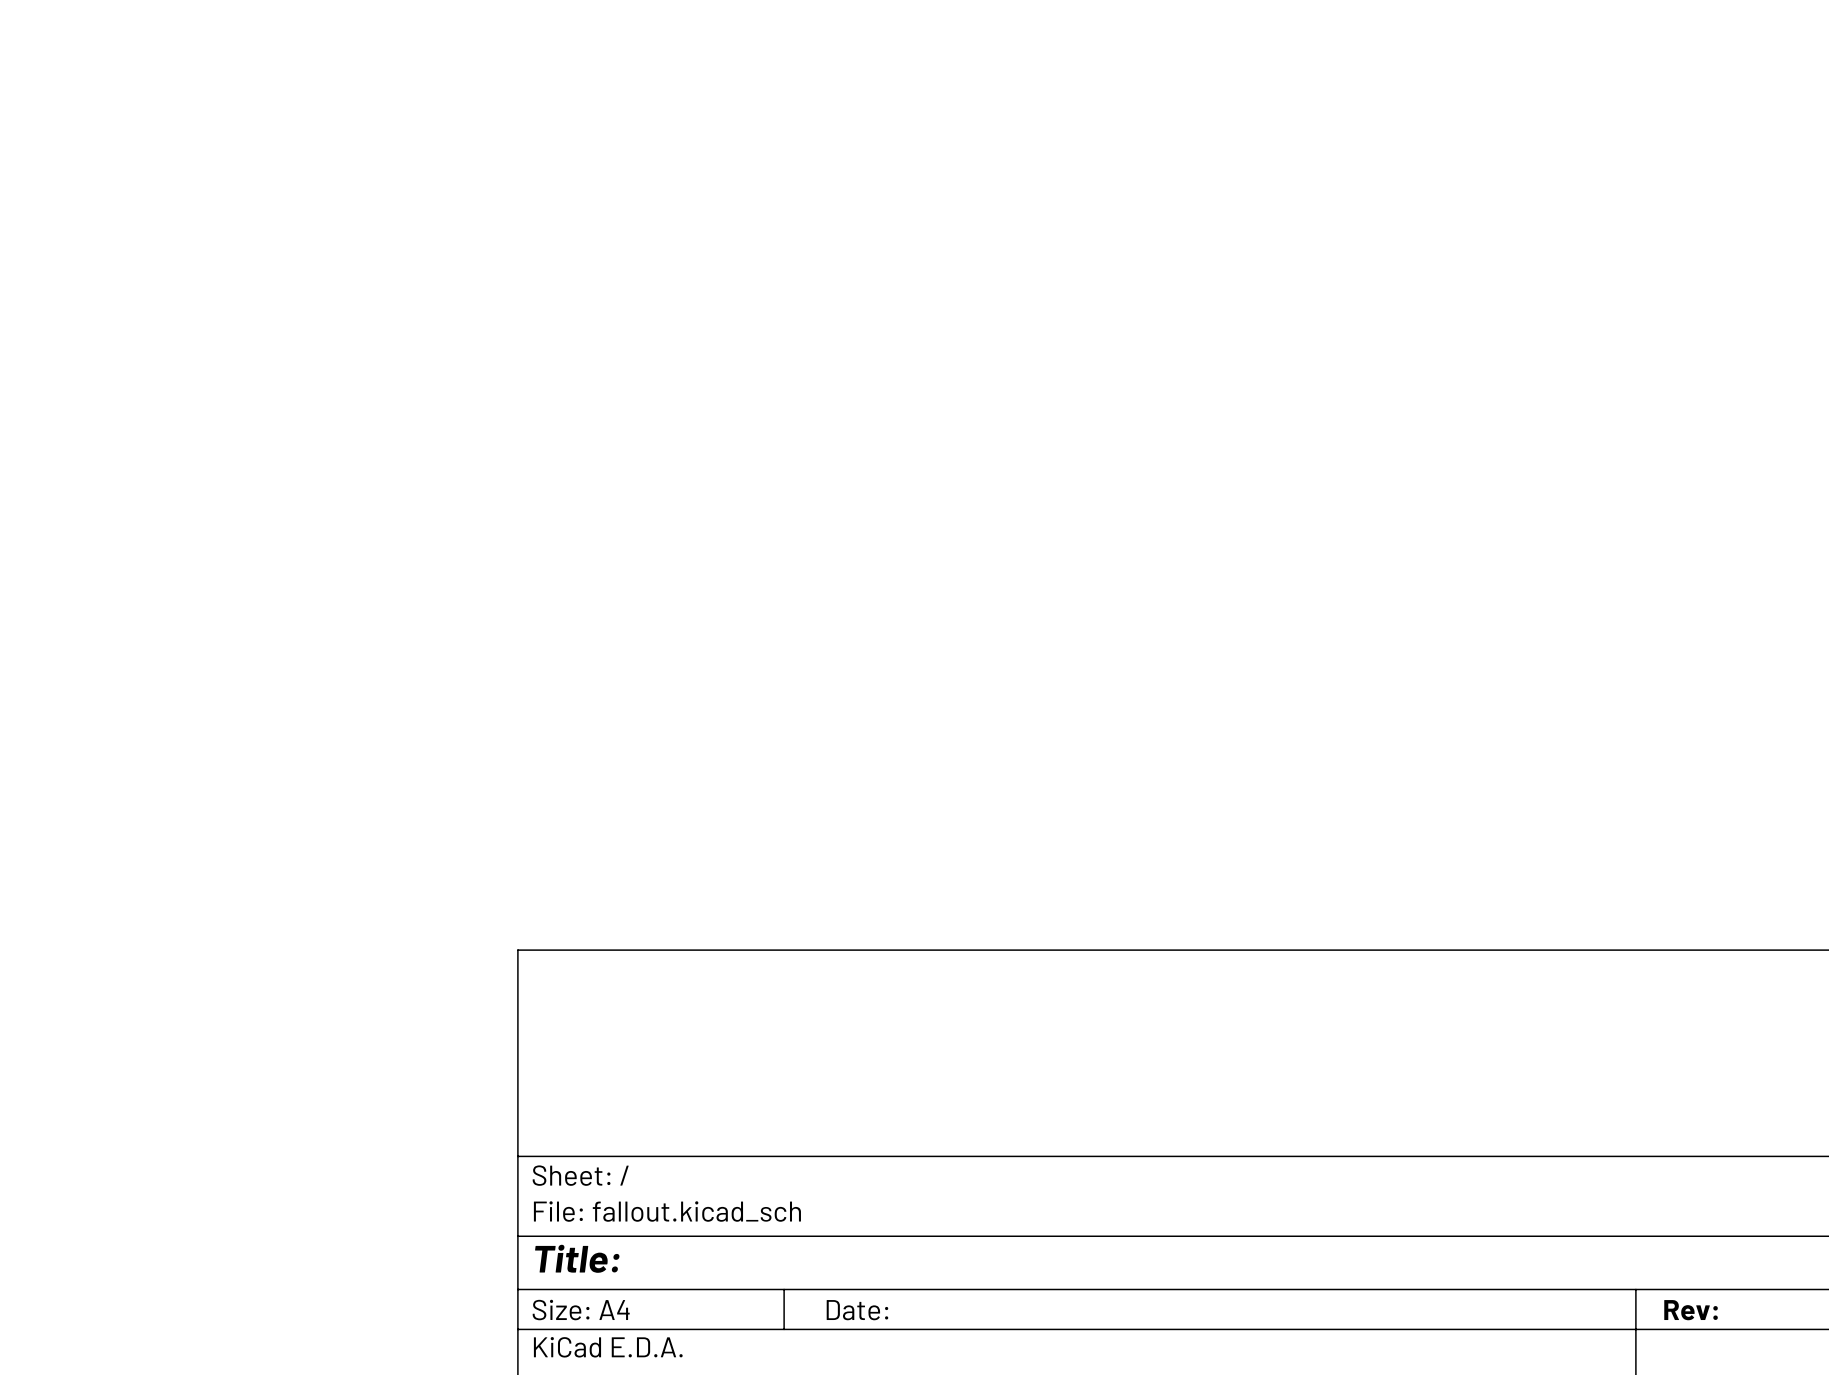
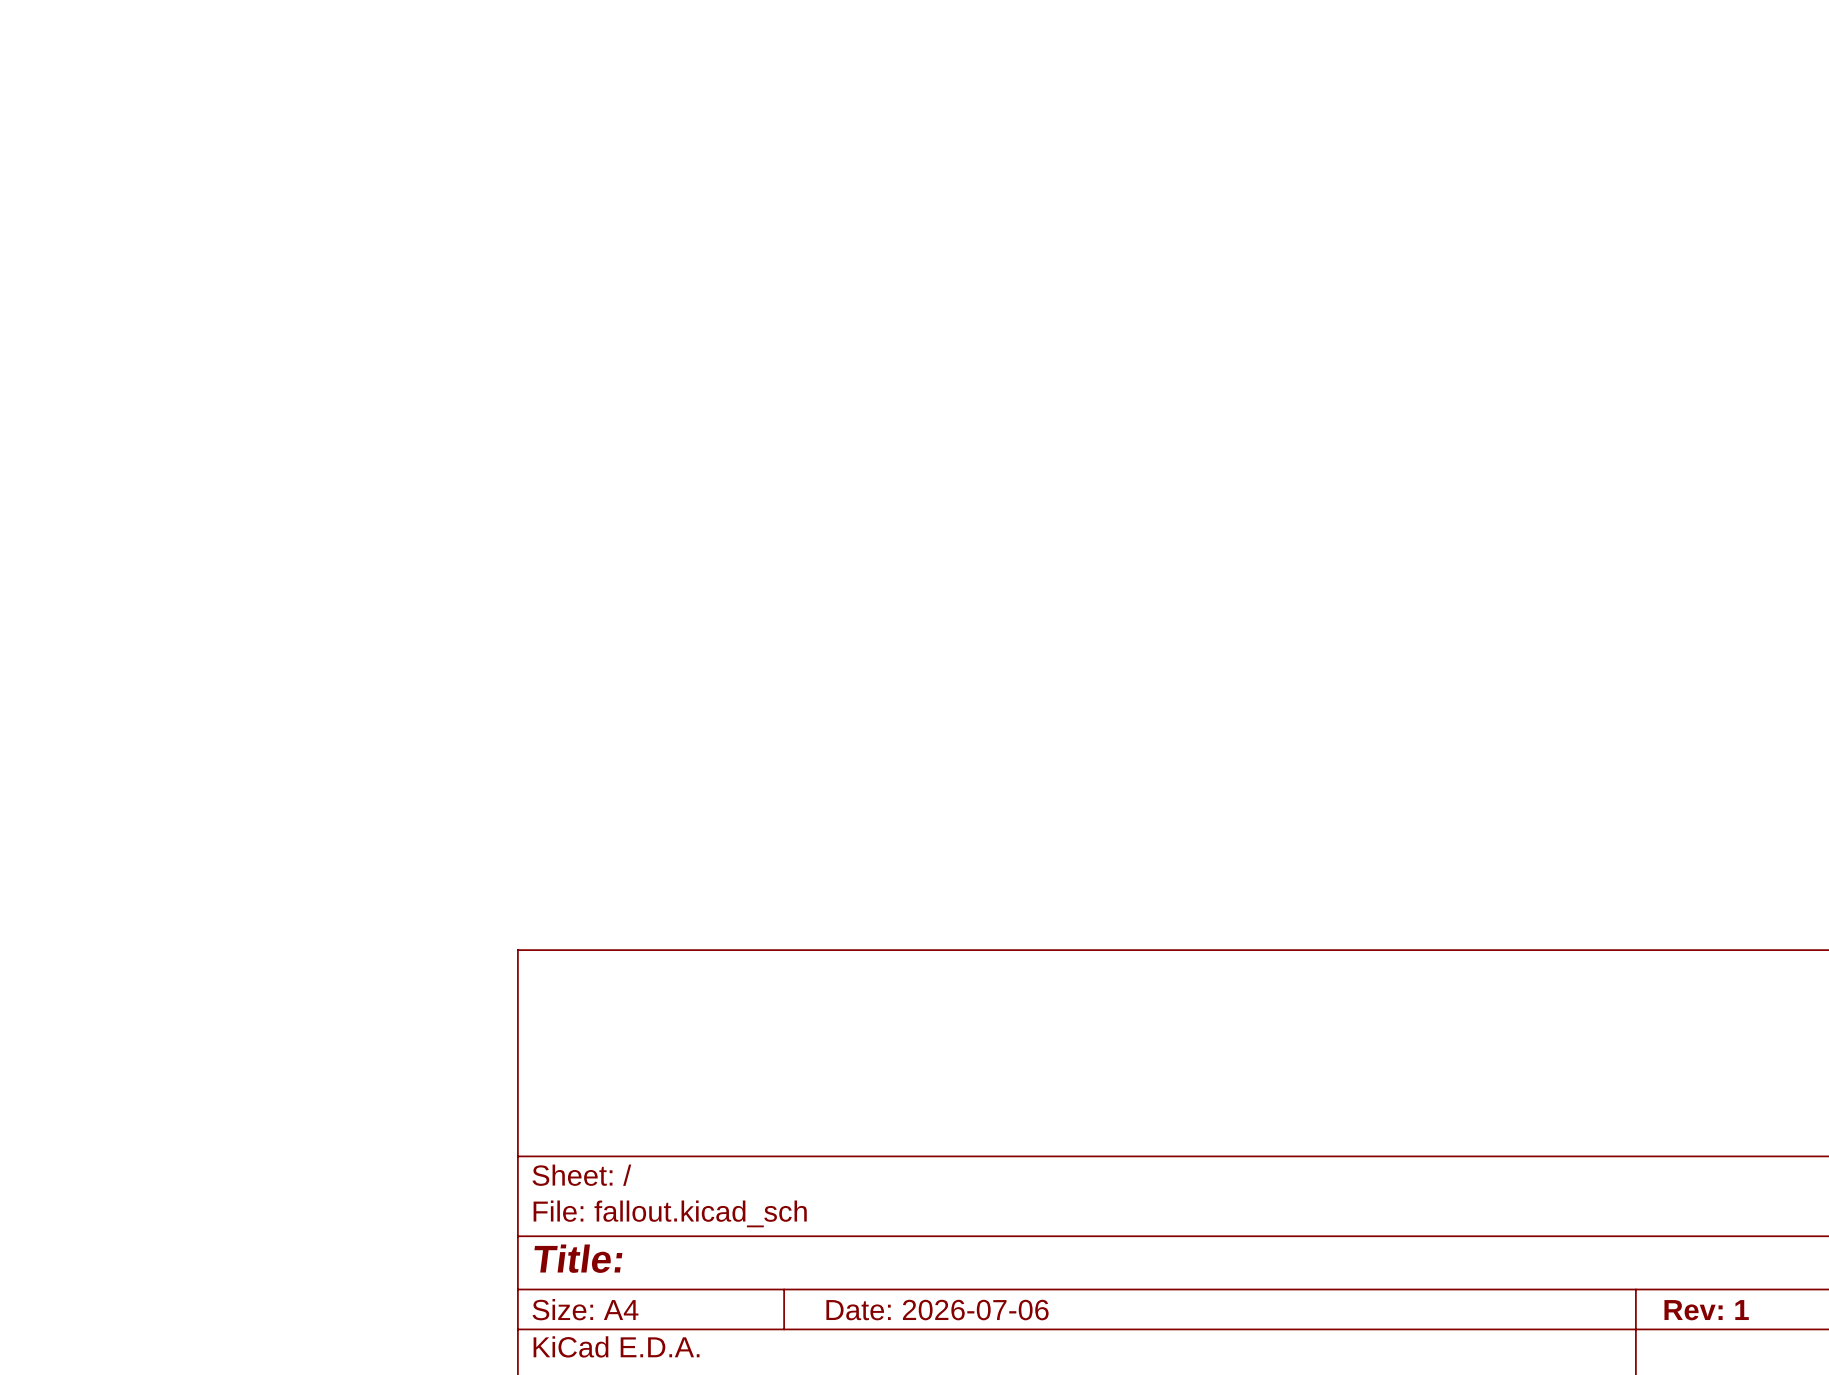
title block: Date: (857, 1310) -> Date: 2026-07-06 (937, 1310)
title block: Rev: (1691, 1310) -> Rev: 1 (1706, 1310)

